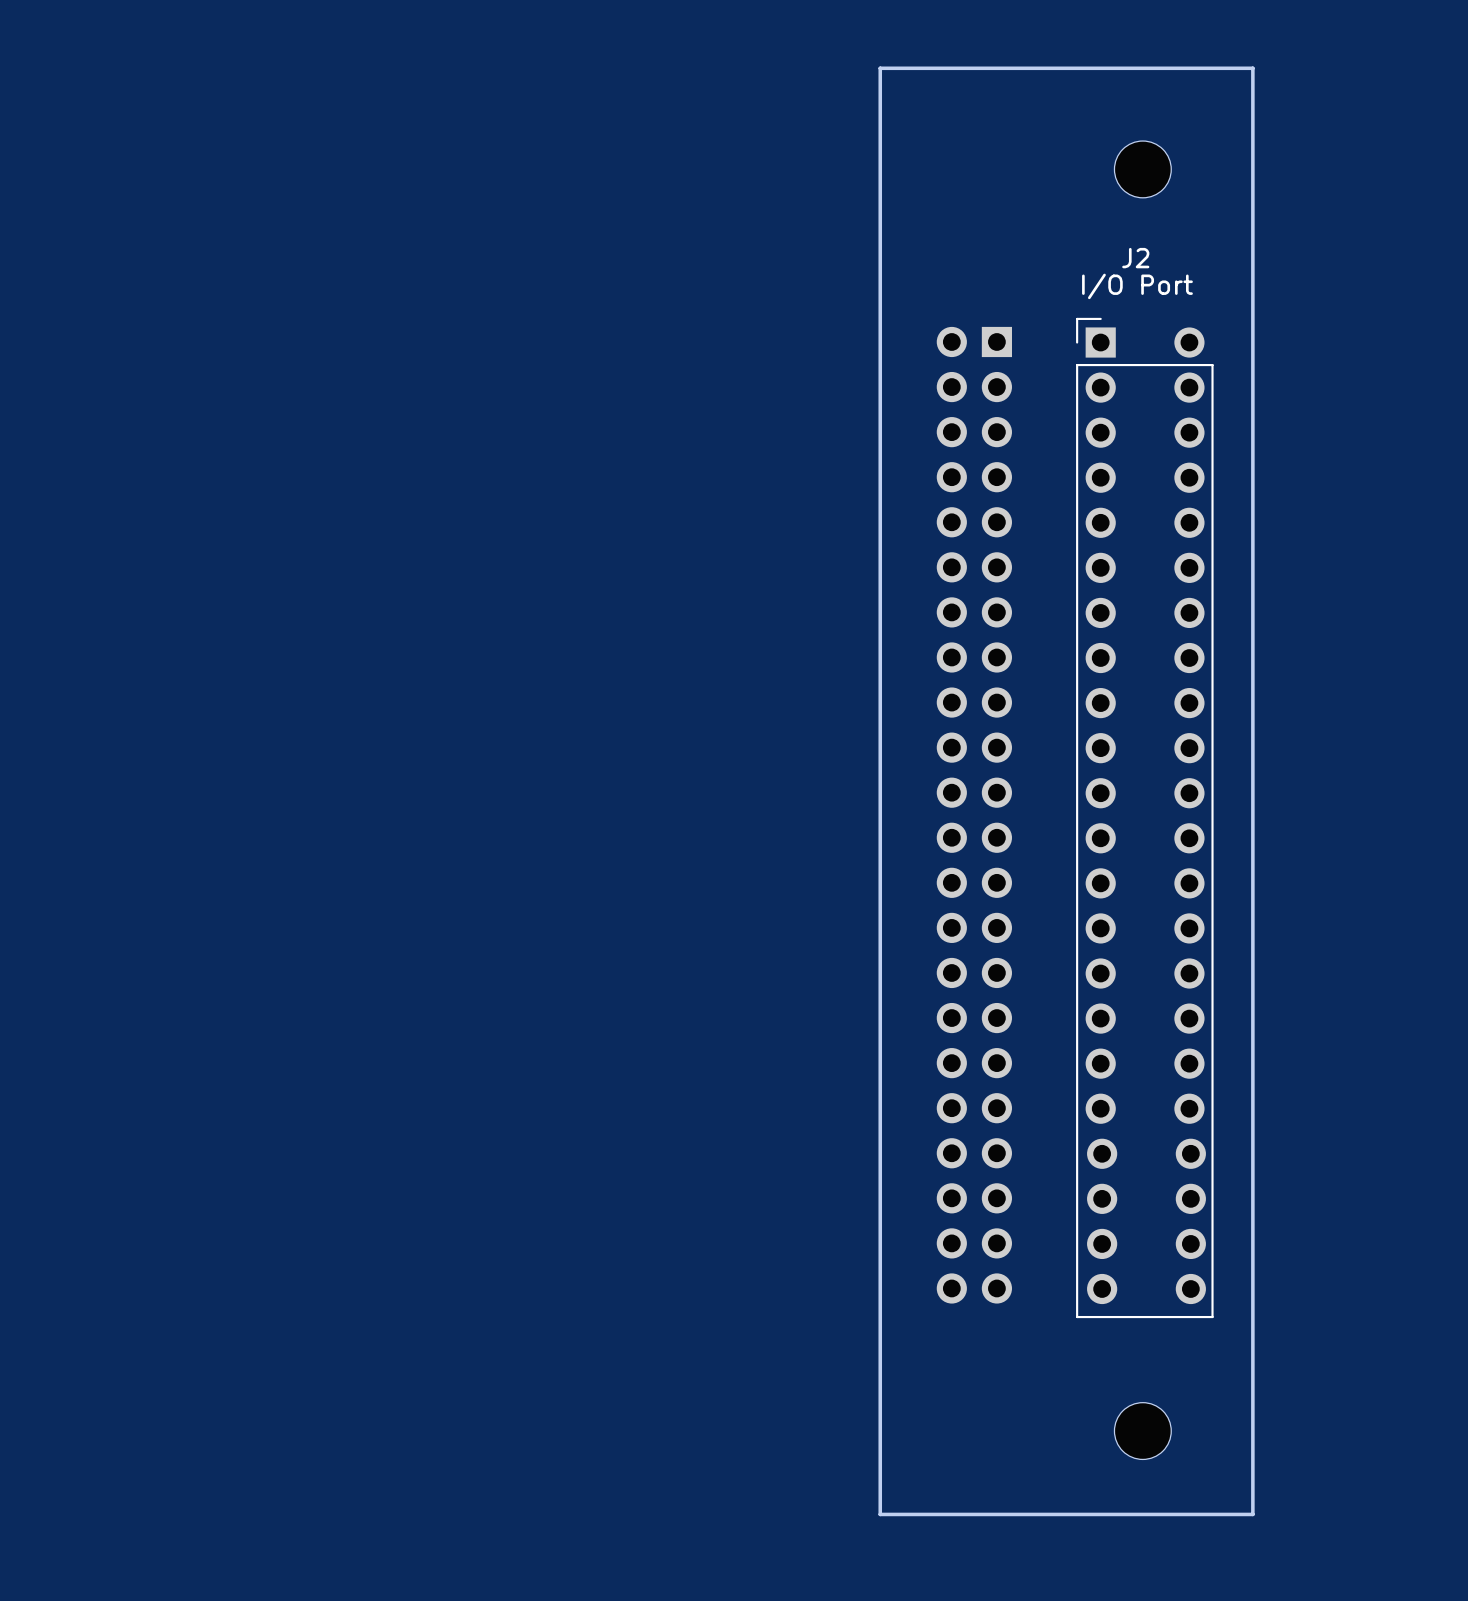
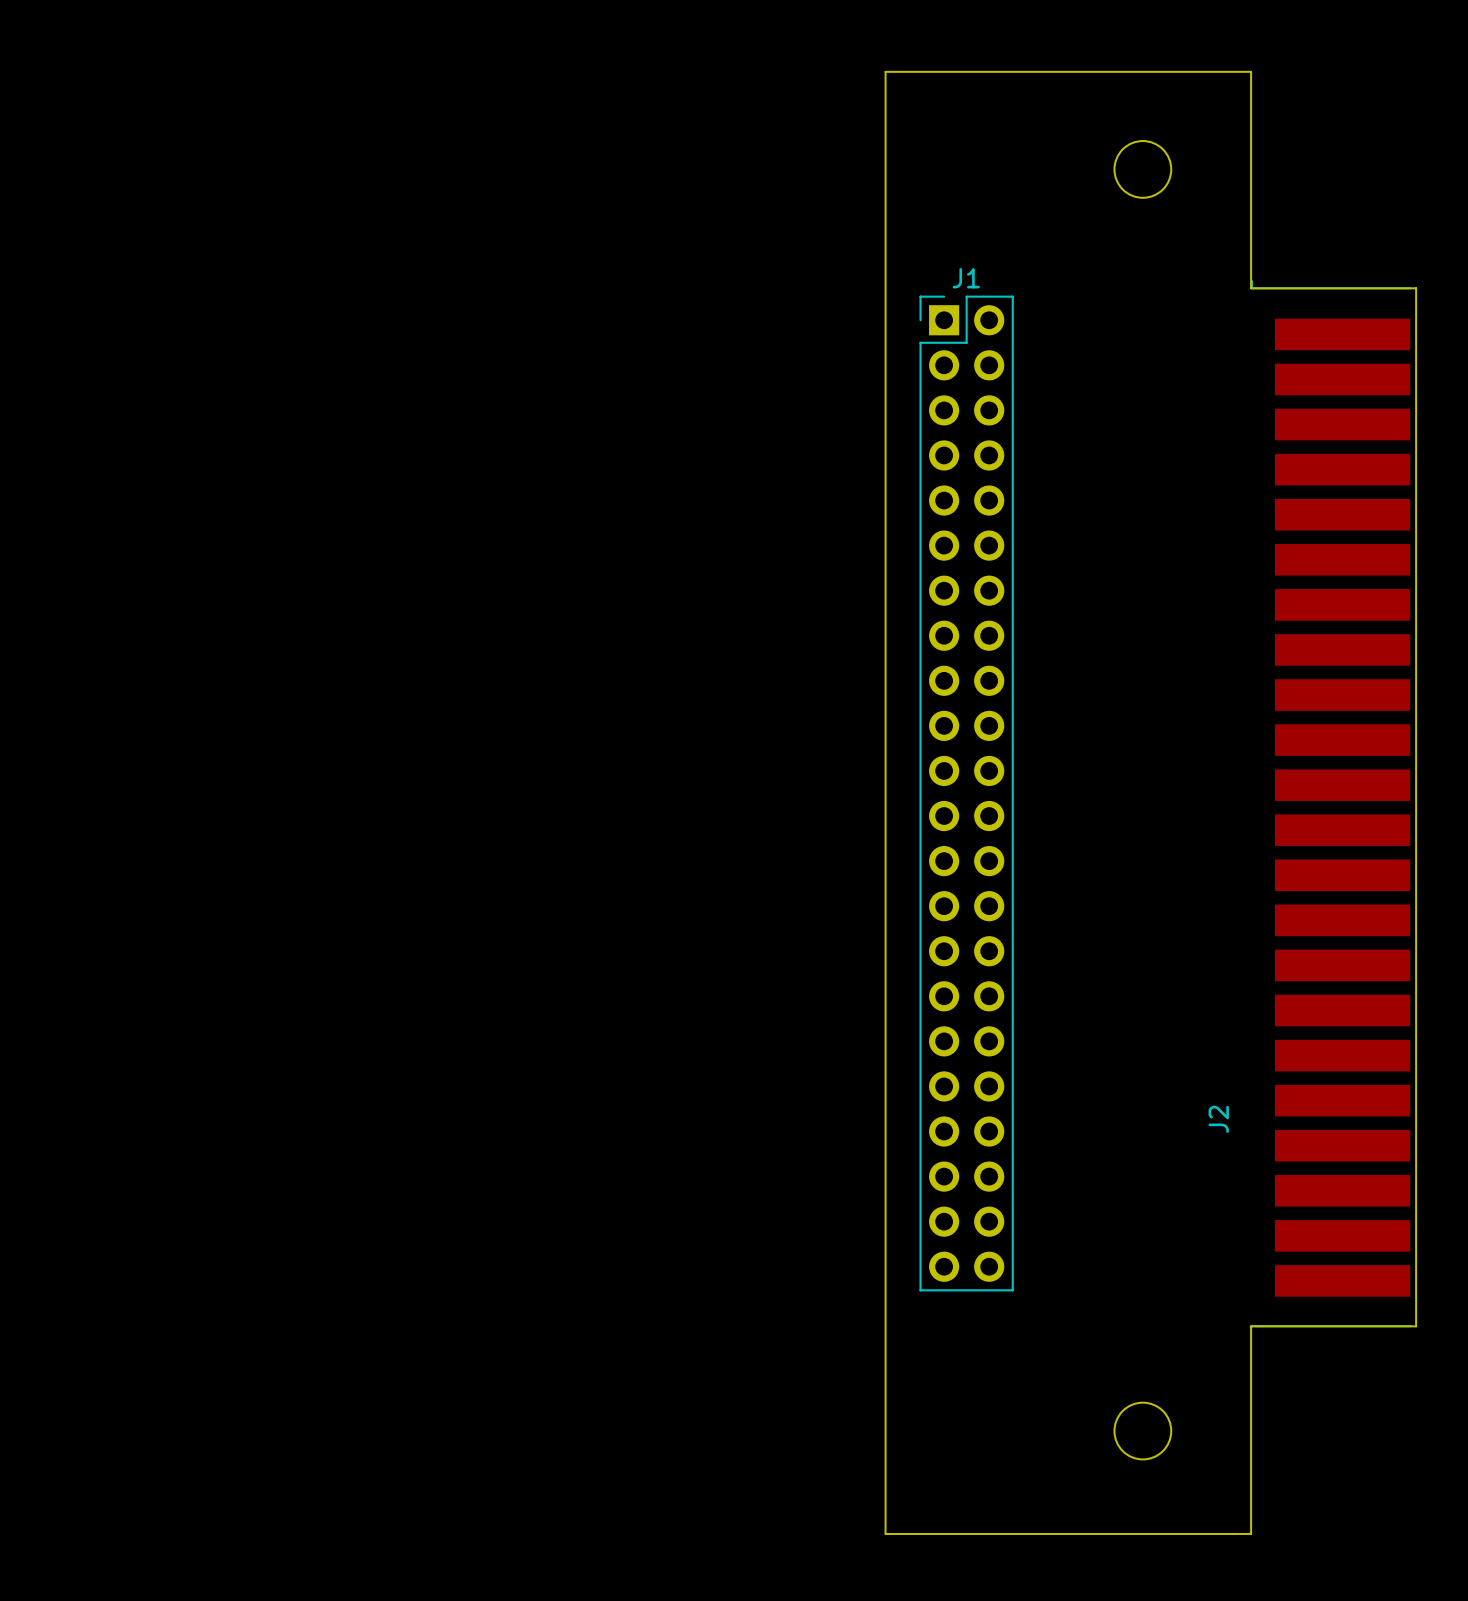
board edge: (880, 68) (1252, 68) (1252, 1514) (880, 1514) (880, 68) -> (885, 71) (885, 1533) (1251, 1533) (1251, 1326) (1416, 1326) (1416, 288) (1251, 288) (1251, 71) (885, 71)
J2 name position: J2 (1135, 258) -> J2 (1218, 1119)
J2 value: I/O Port (1137, 286) -> none
J2 footprint: [1076, 317, 1214, 1319] -> [1250, 280, 1412, 1328]
J1 side: bottom (974, 815) -> top (966, 793)

